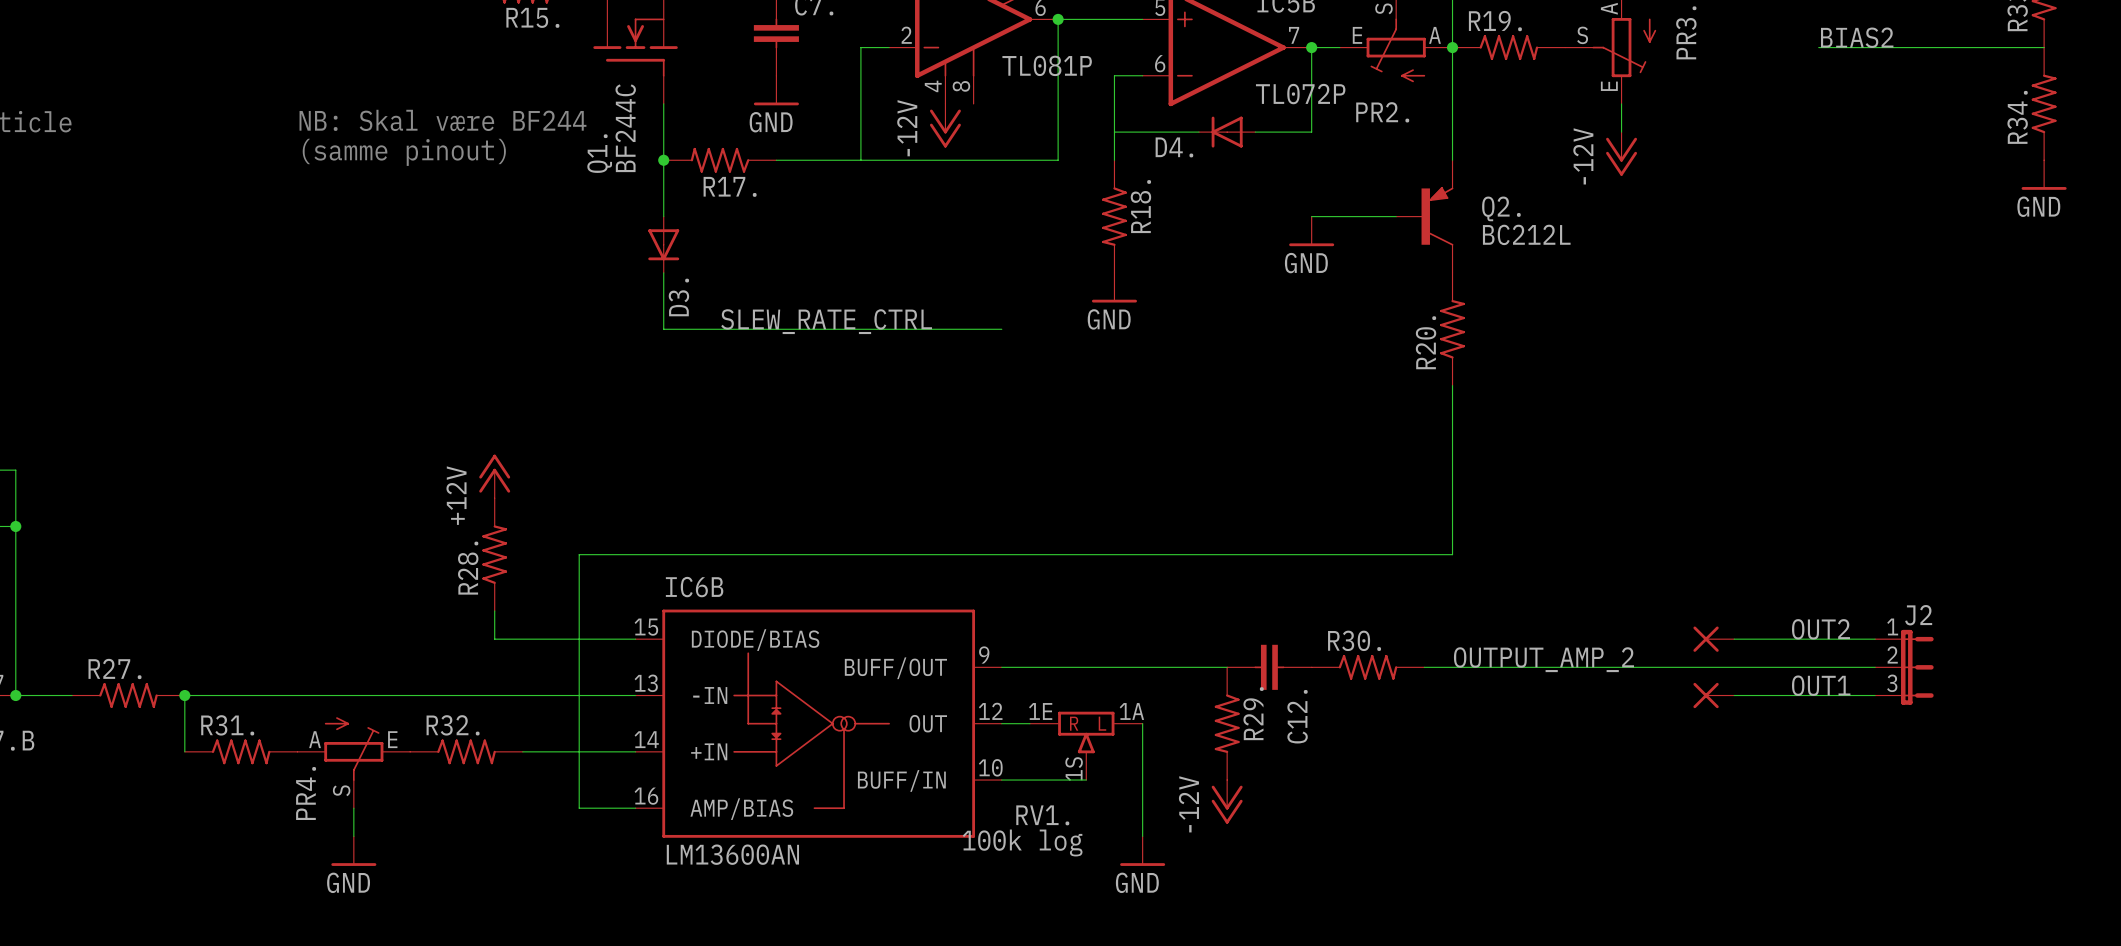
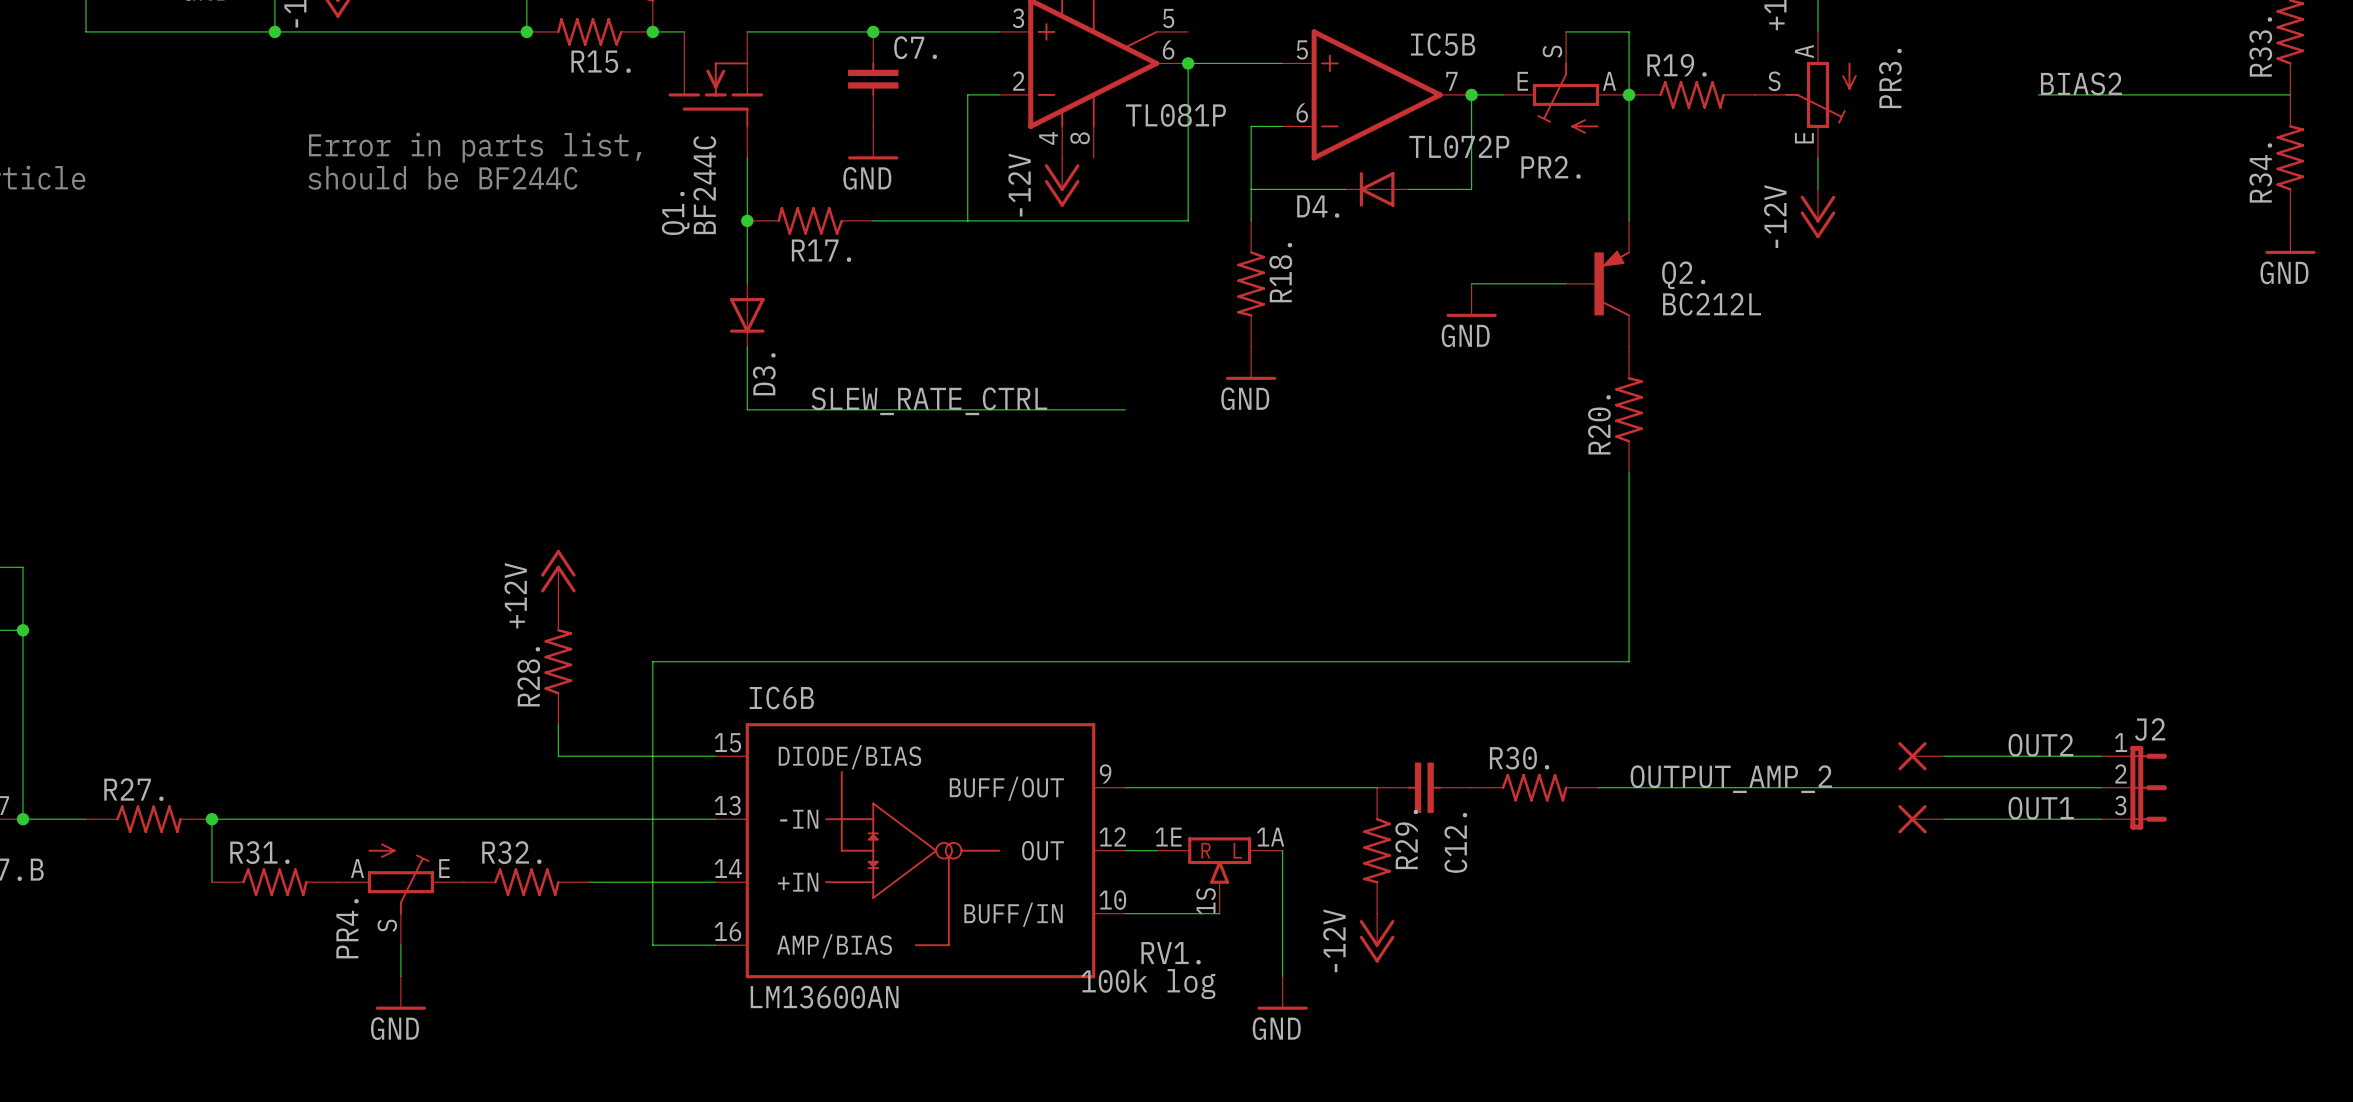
text: none -> Error in parts list, (475, 147)
text: NB: Skal være BF244 (442, 120) -> none
text: none -> should be BF244C (442, 177)
text: (samme pinout) (404, 152) -> none

